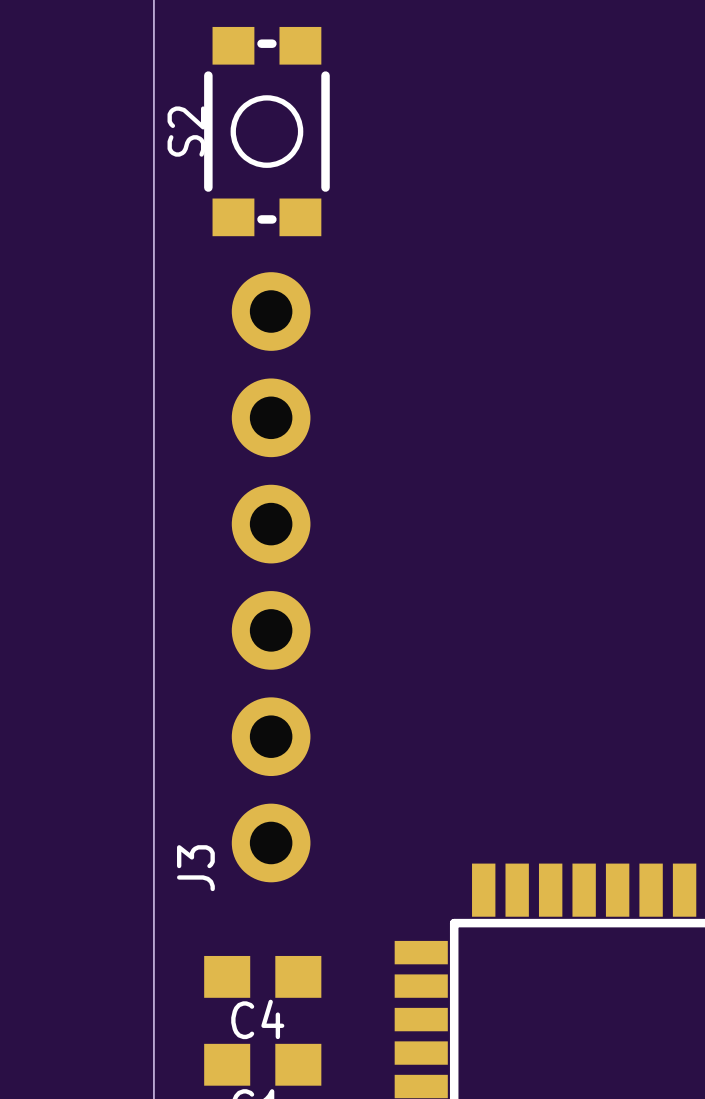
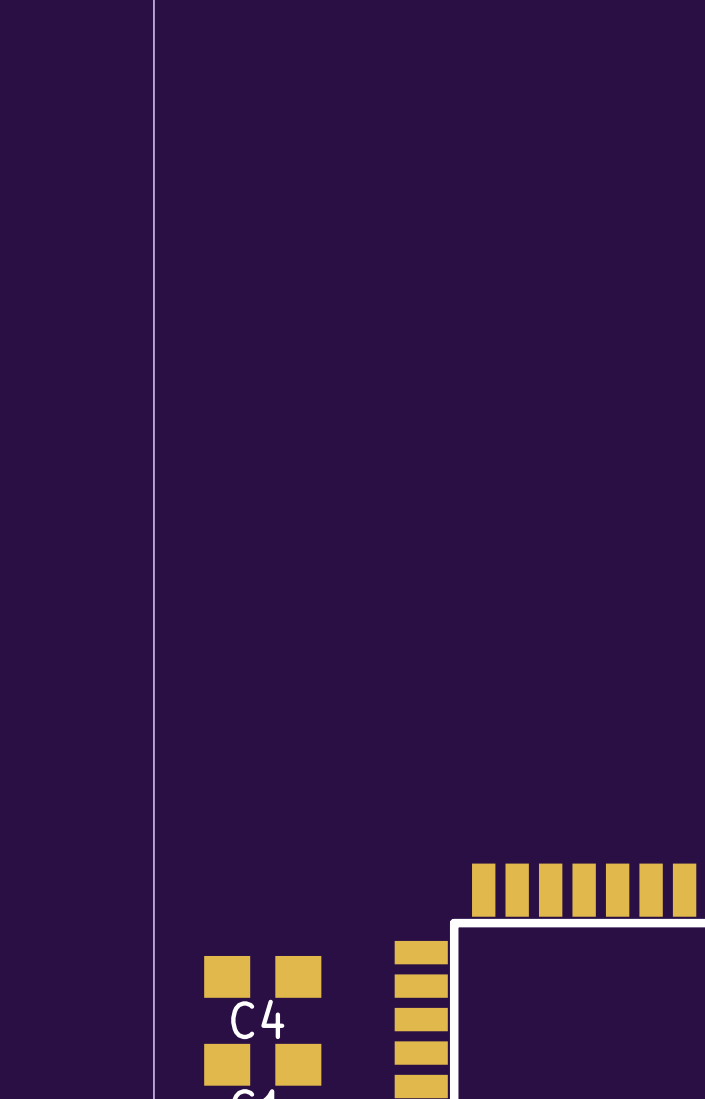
S2: (266, 131) -> none
J3: (271, 577) -> none

